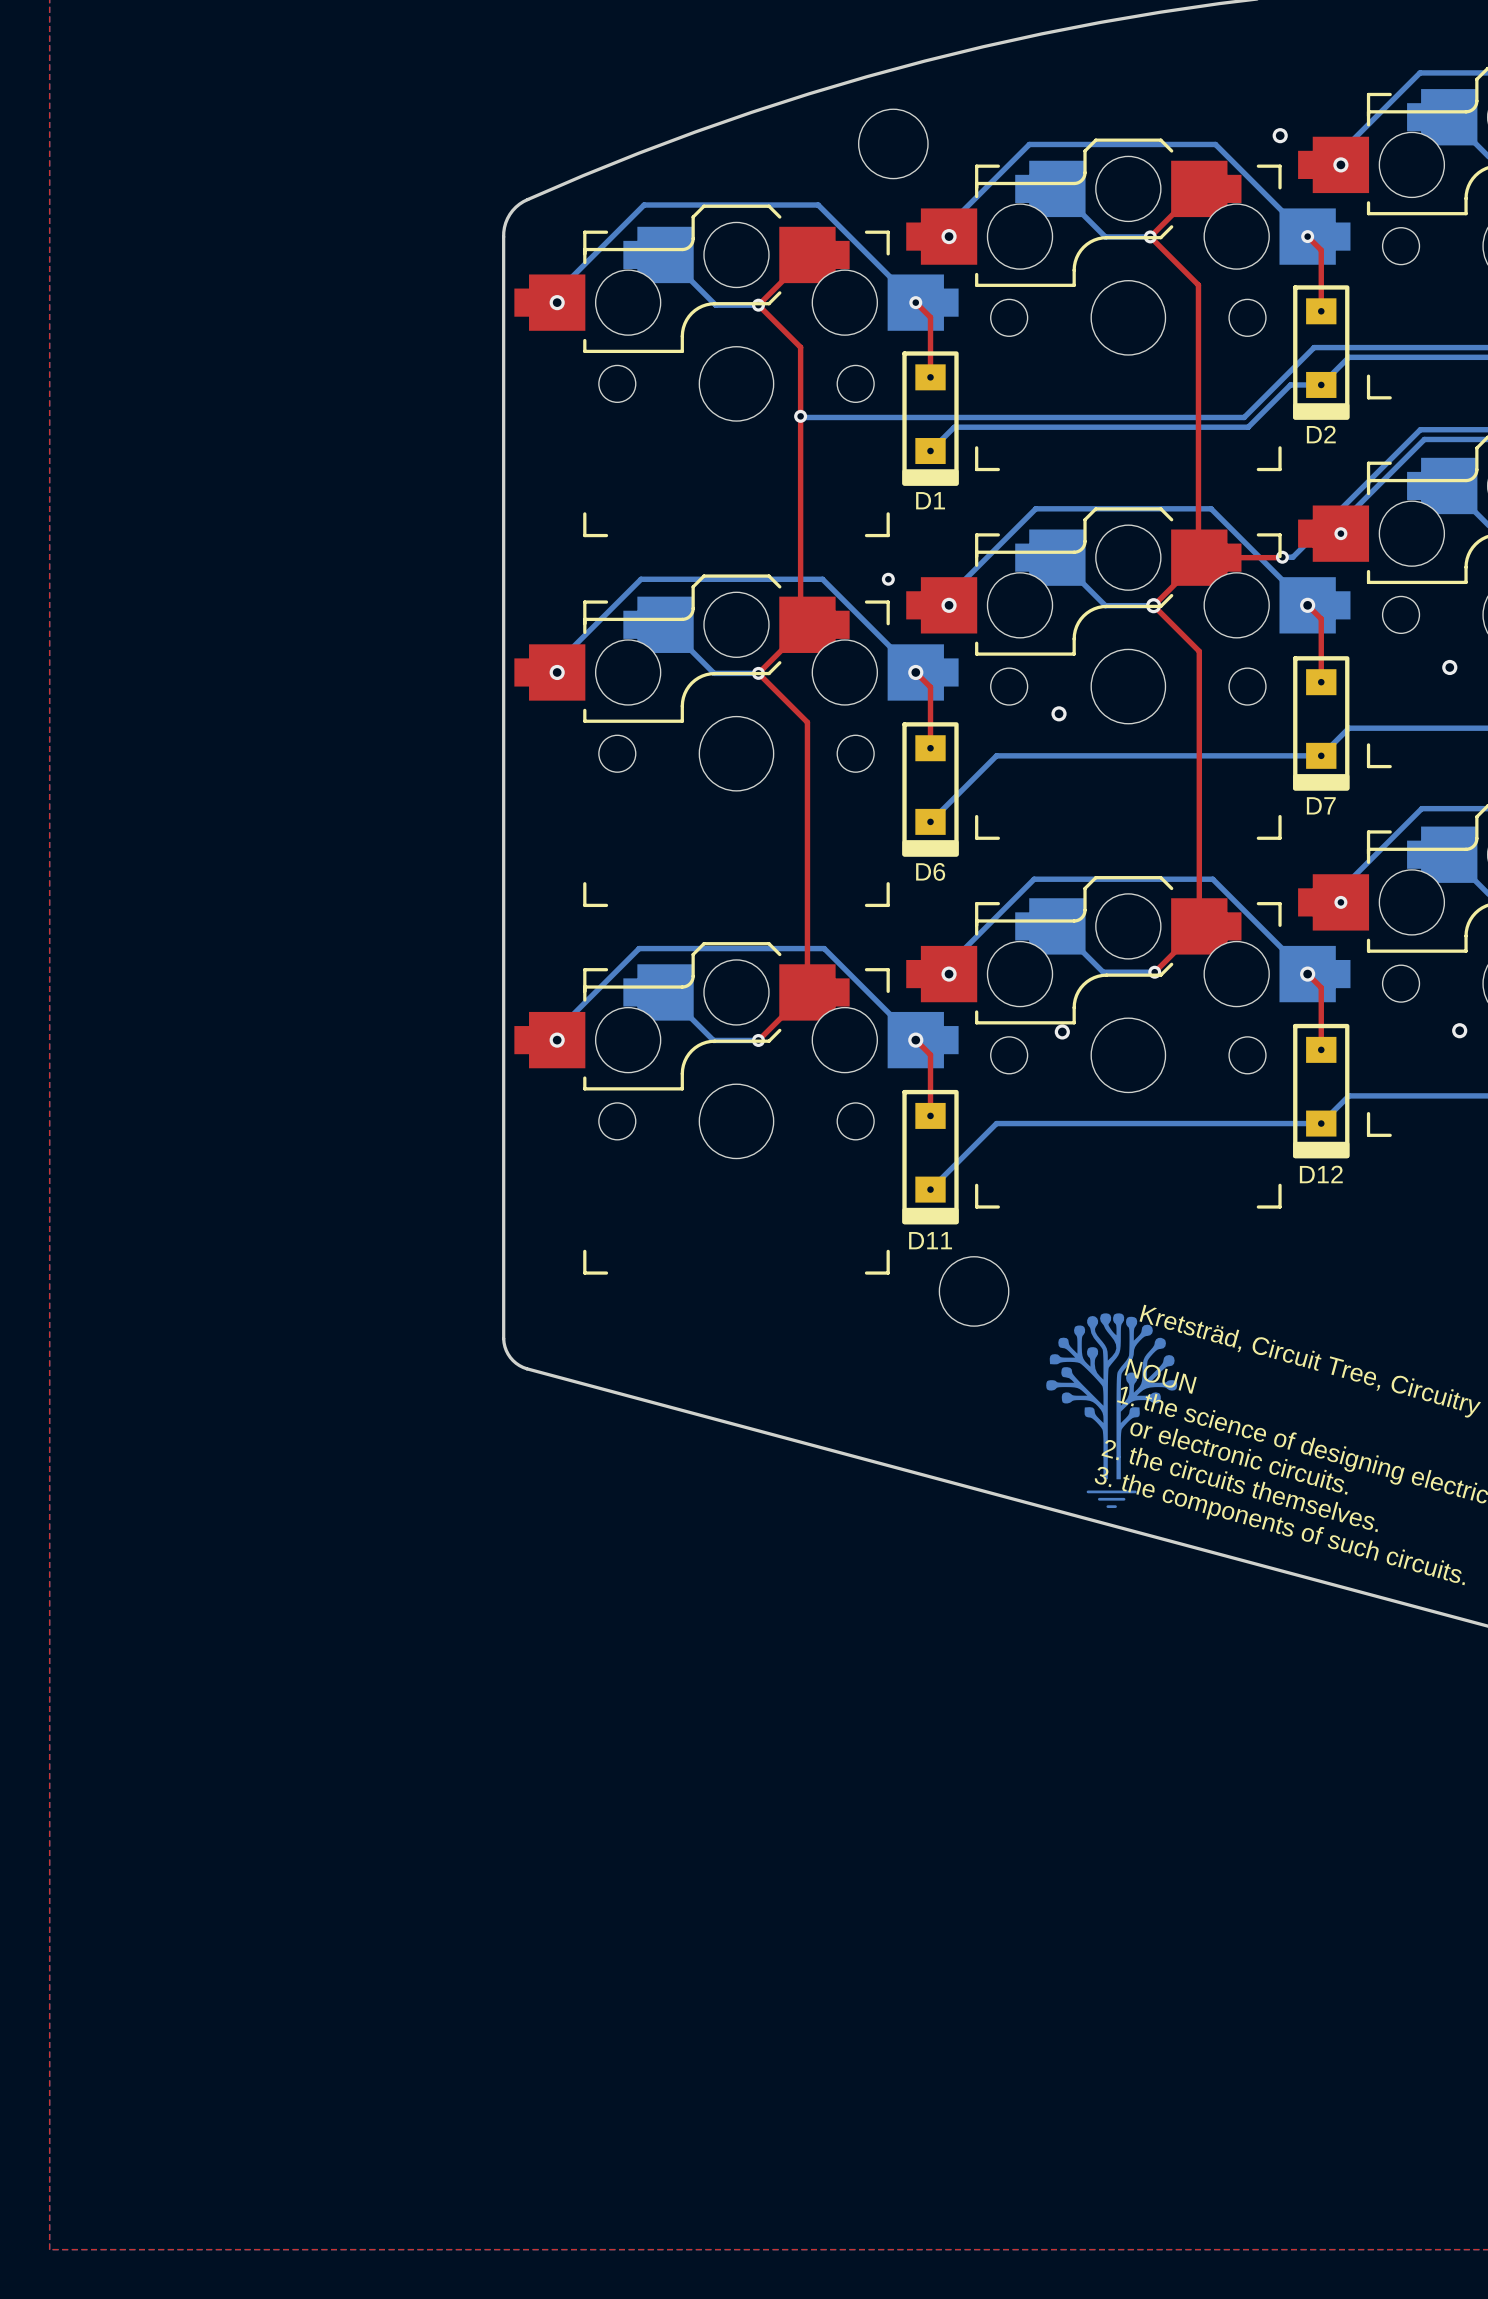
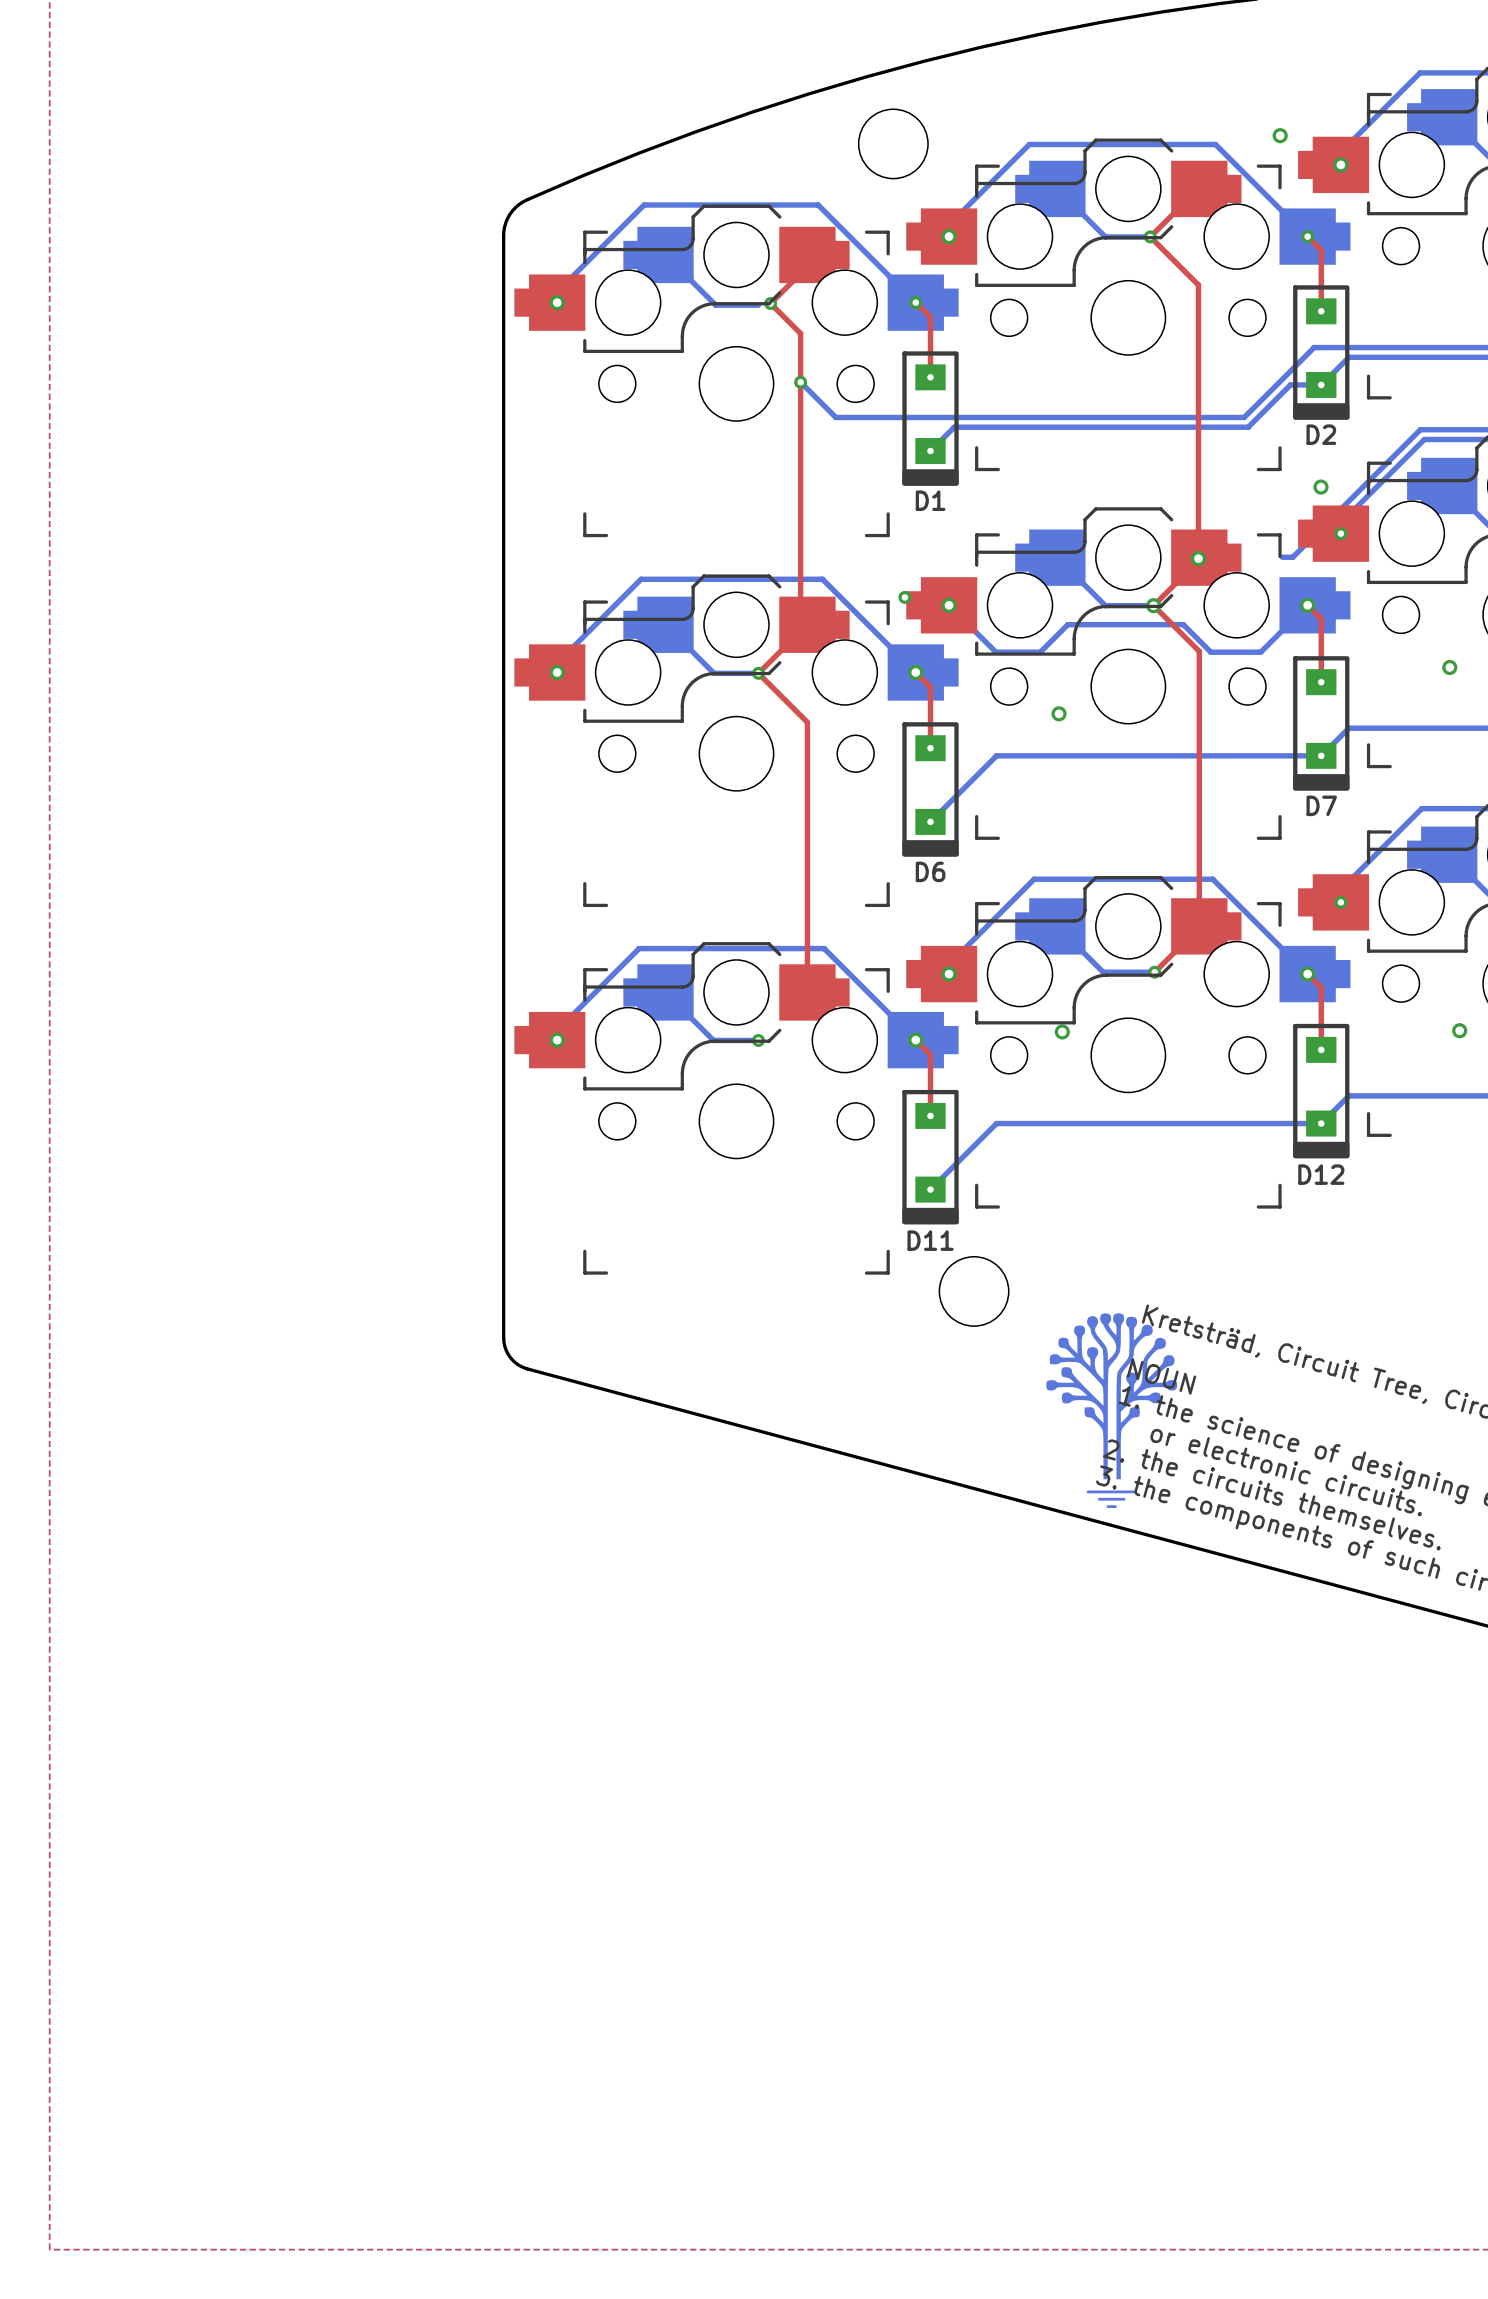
top track: (796, 266) (758, 305) (800, 347) -> (807, 266) (770, 303) (800, 333) (800, 347)
via position: (758, 305) -> (770, 303)
bottom track: (800, 416) (835, 417) -> (800, 382) (835, 417)
via position: (800, 416) -> (800, 382)
via: none -> (1321, 487)
top track: (1282, 557) (1199, 557) -> none
via: (1282, 557) -> none
via: none -> (1198, 558)
via position: (888, 579) -> (904, 597)
bottom track: (949, 605) (949, 595) (1035, 508) (1211, 508) (1307, 605) -> (949, 605) (995, 652) (1040, 652) (1067, 624) (1183, 624) (1210, 652) (1260, 652) (1307, 605)
top track: (796, 1001) (758, 1040) -> none

